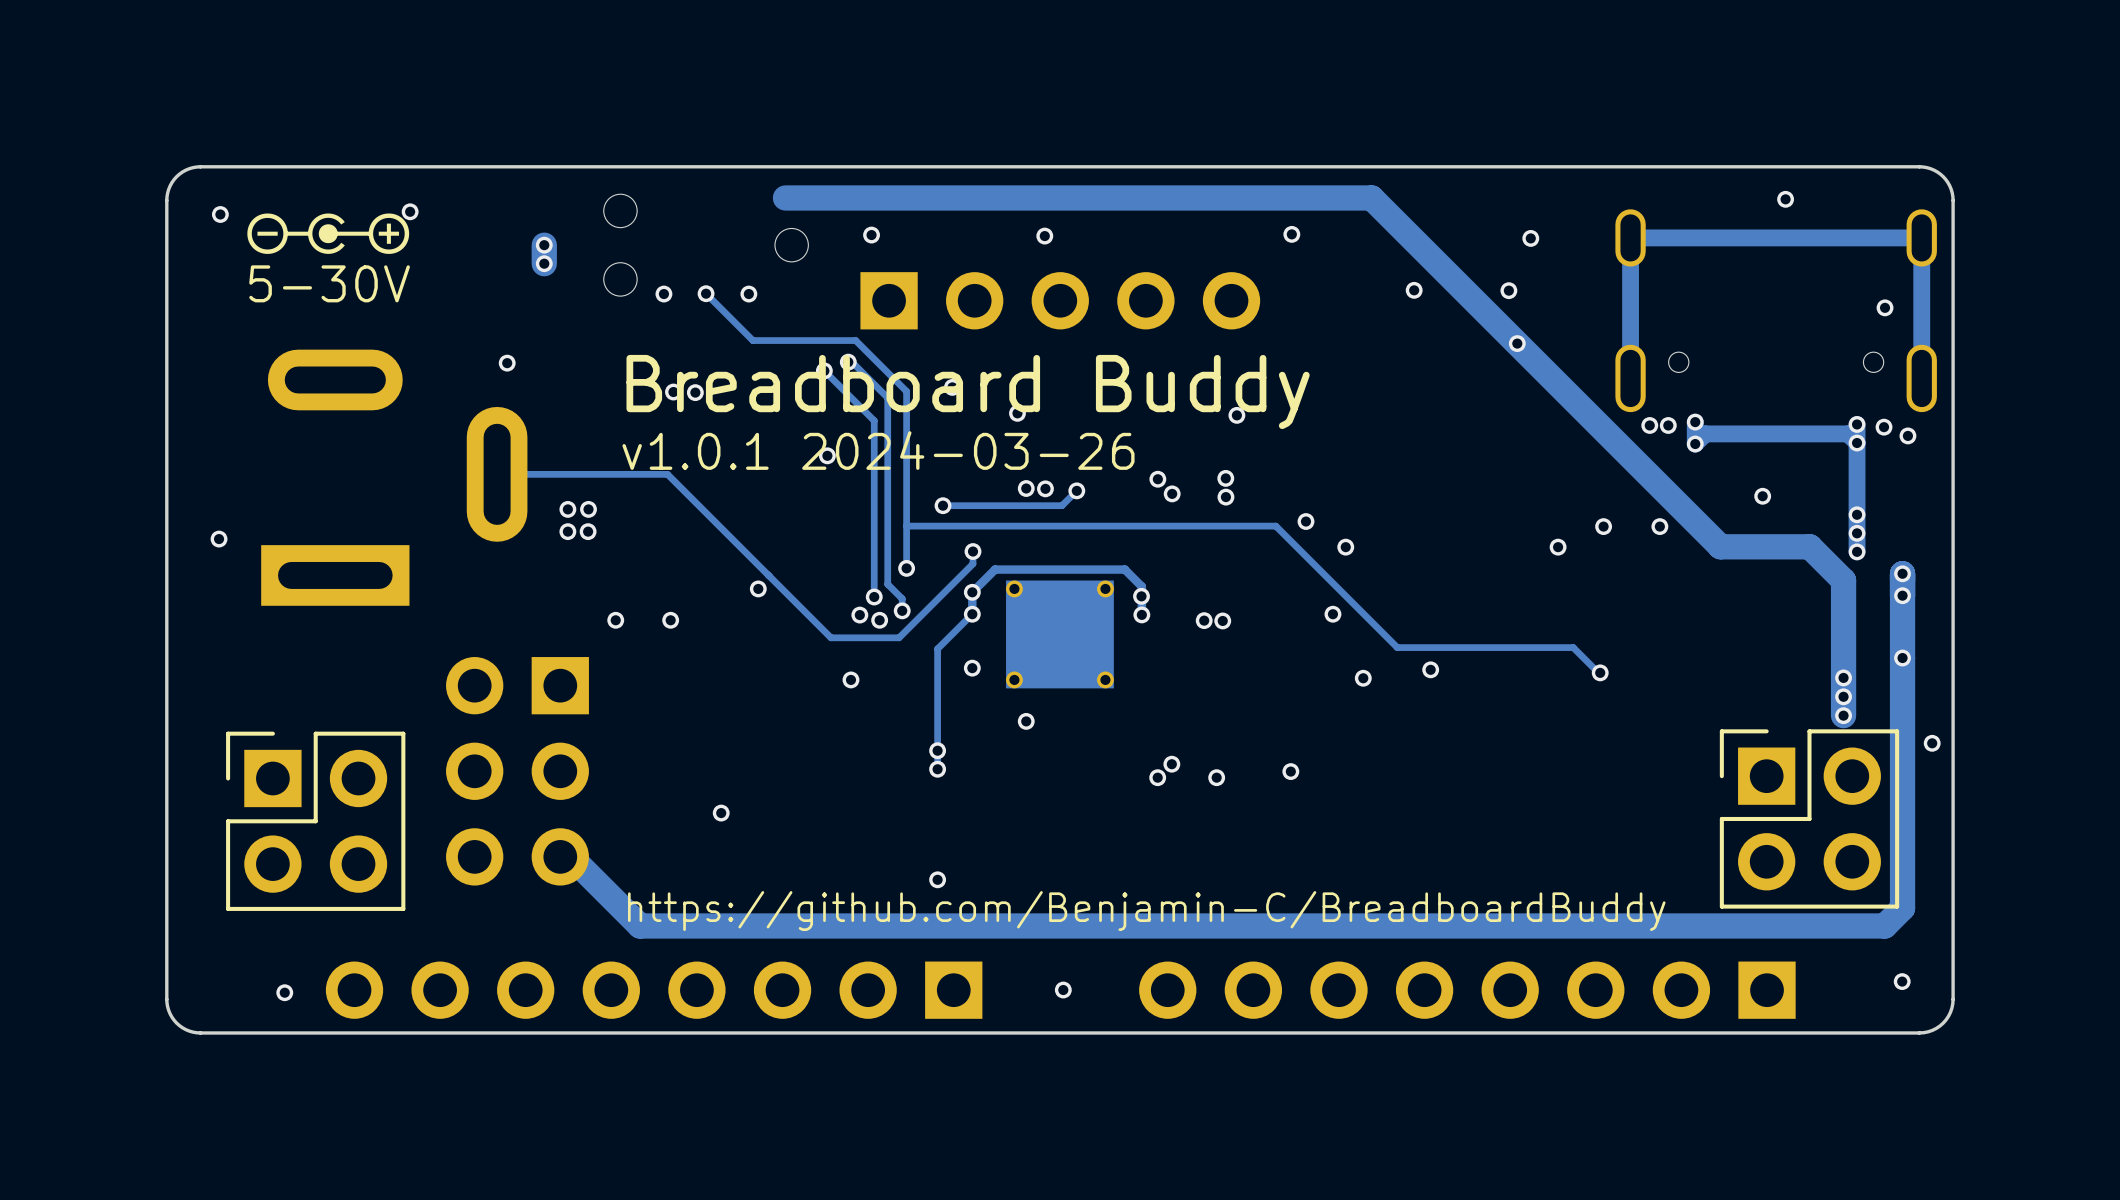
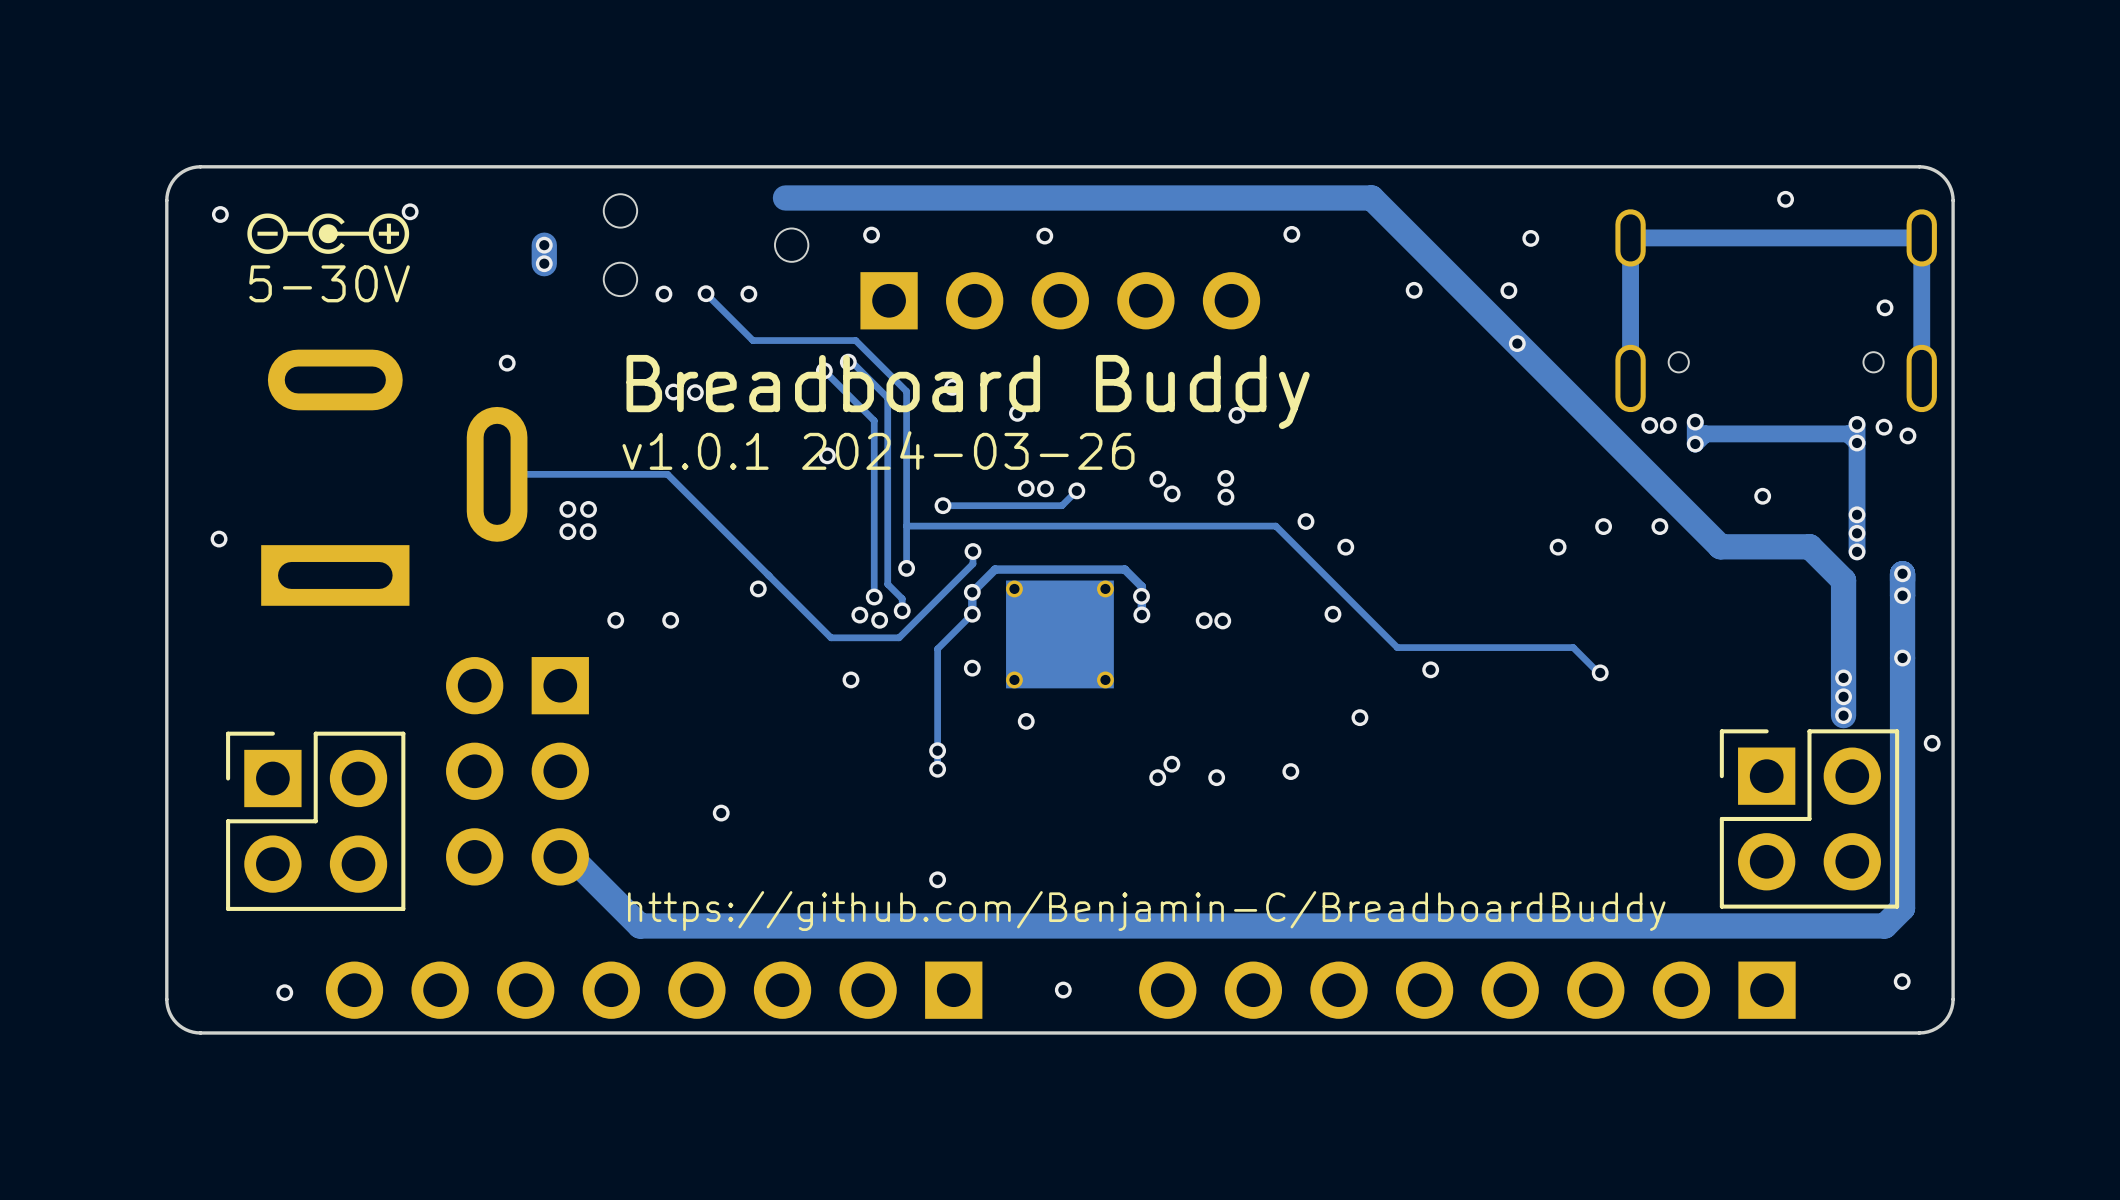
via position: (1363, 678) -> (1359, 717)

